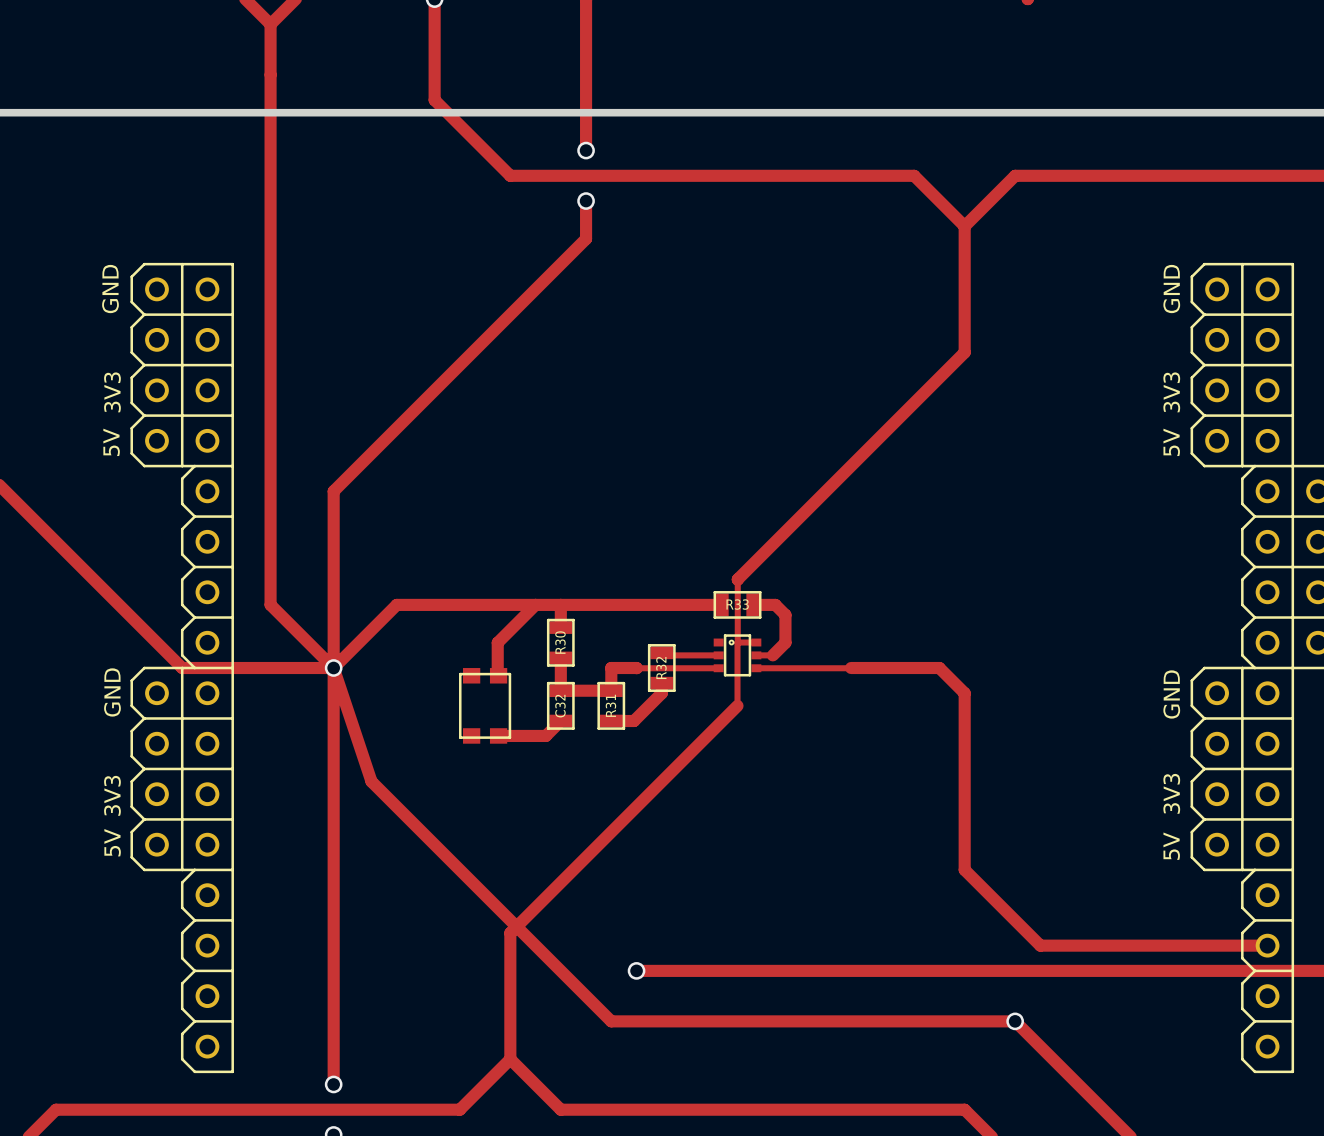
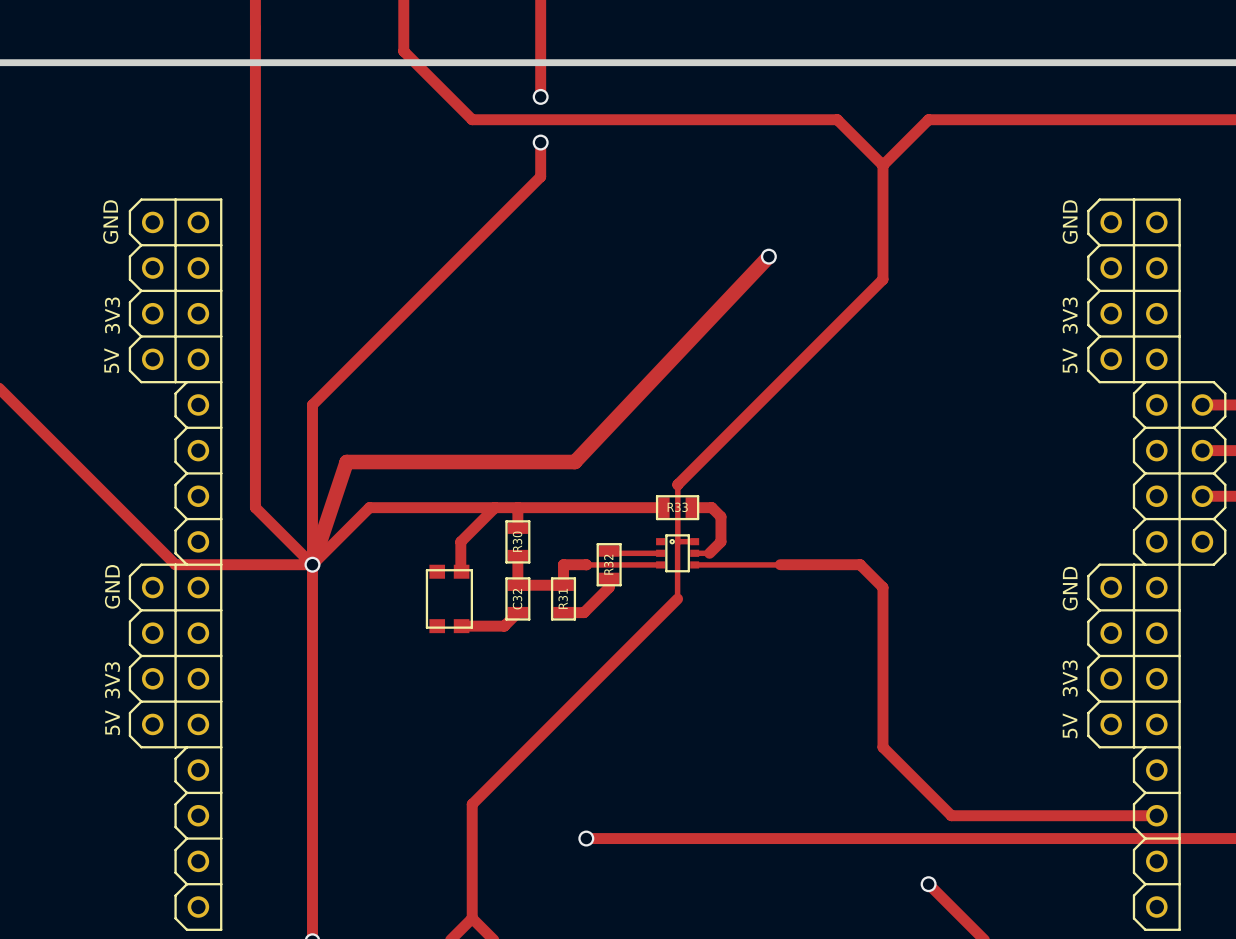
via: none -> (768, 256)
track: (333, 668) (371, 781) (611, 1021) (1015, 1021) -> (312, 564) (346, 462) (574, 462) (768, 256)

